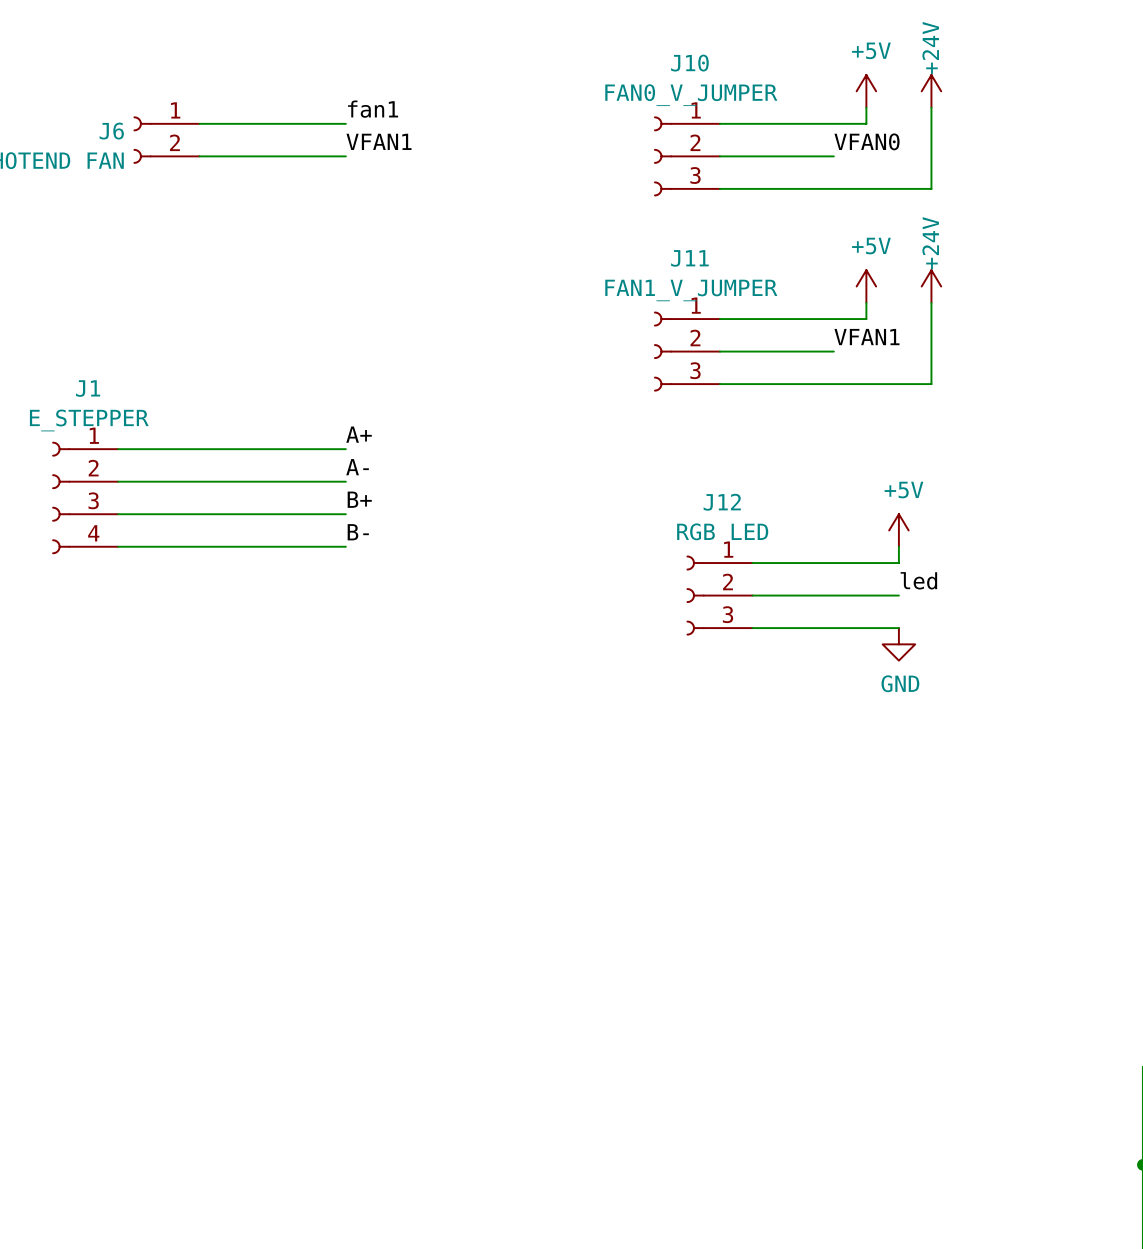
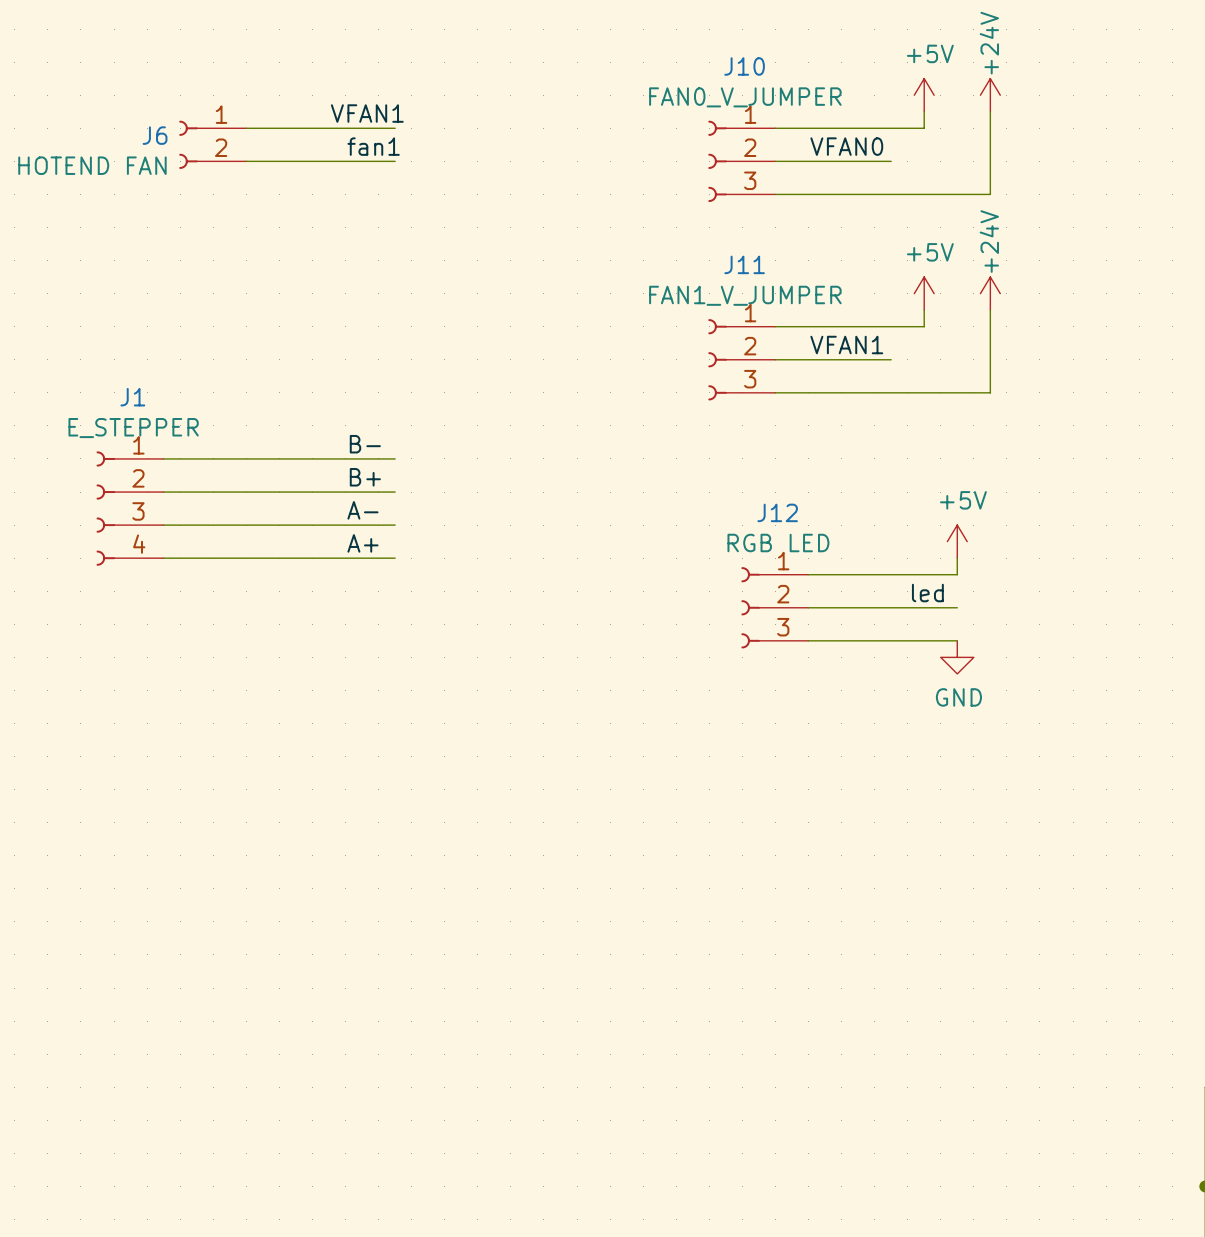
label position: fan1 (373, 109) -> fan1 (373, 146)
label position: VFAN1 (379, 141) -> VFAN1 (367, 113)
label position: VFAN0 (867, 141) -> VFAN0 (846, 146)
label position: VFAN1 (866, 337) -> VFAN1 (846, 345)
label position: A+ (359, 434) -> A+ (362, 543)
label position: A- (357, 467) -> A- (362, 510)
label position: B+ (359, 499) -> B+ (365, 477)
label position: B- (358, 532) -> B- (365, 444)
label position: led (918, 580) -> led (927, 593)

